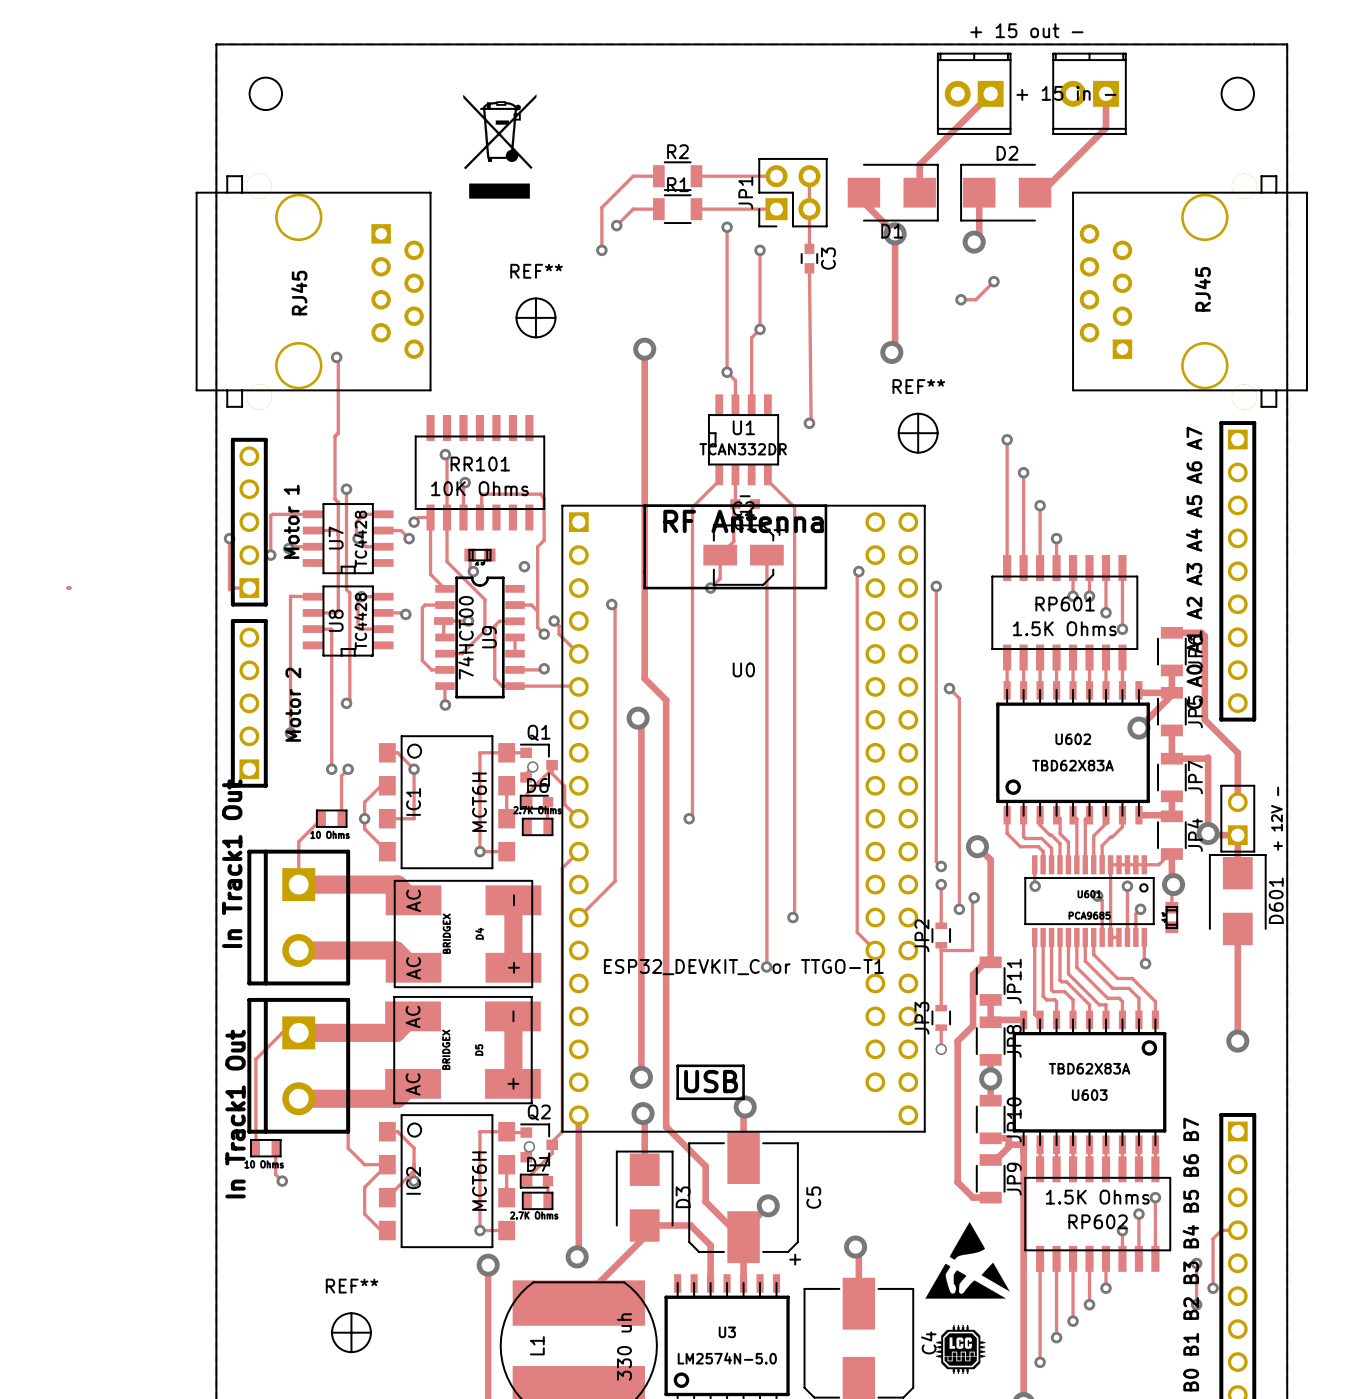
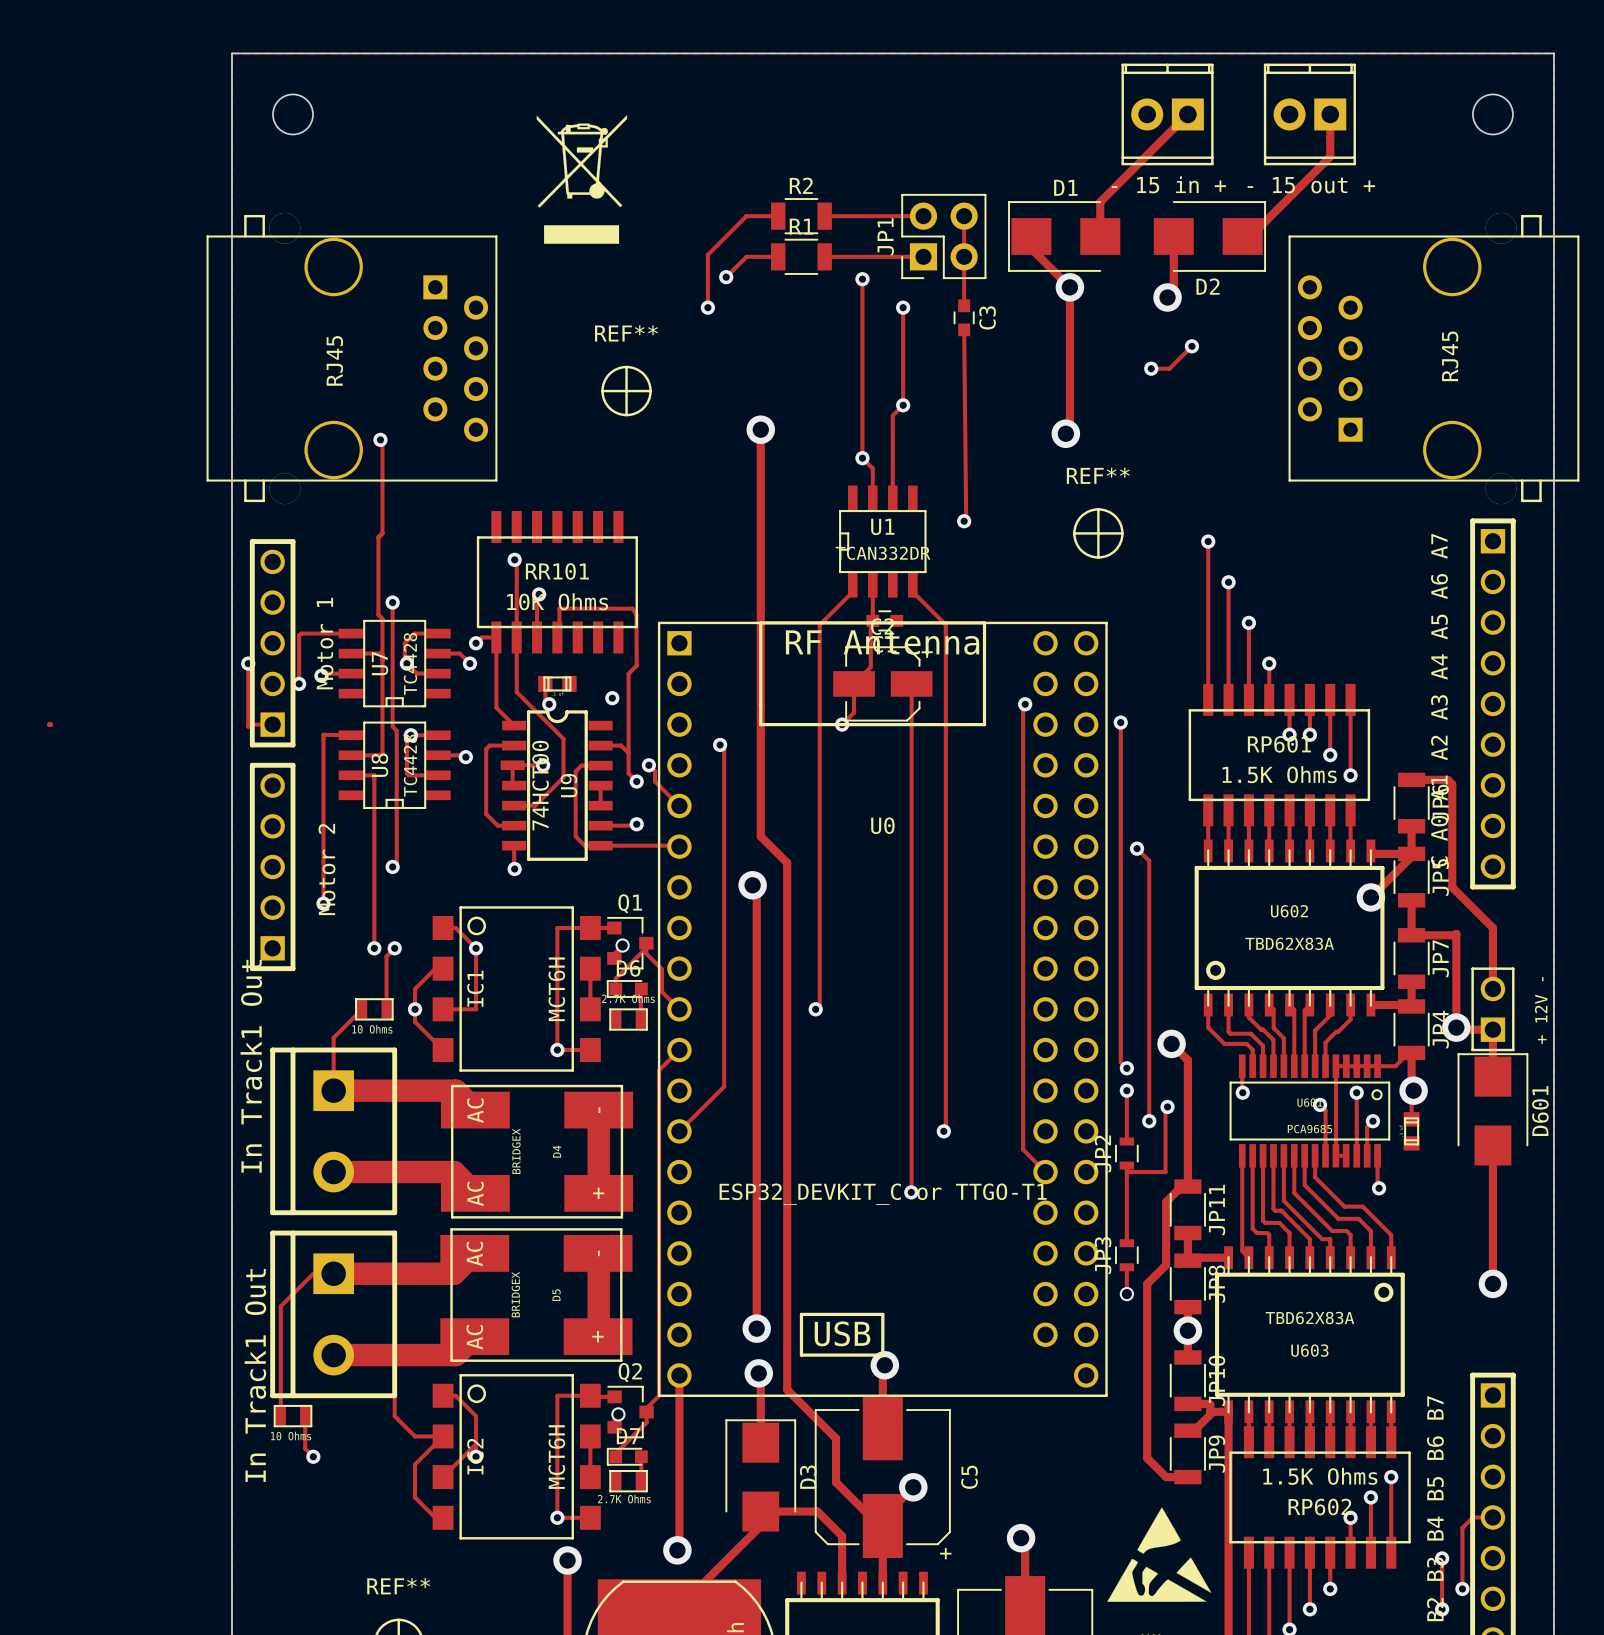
part value: + 15 out - (1026, 30) -> - 15 out + (1311, 185)
part value: + 15 in - (1066, 93) -> - 15 in + (1168, 184)
D1 rotation: 0° (893, 192) -> 180° (1064, 236)
D2 rotation: 0° (1005, 192) -> 180° (1209, 236)

